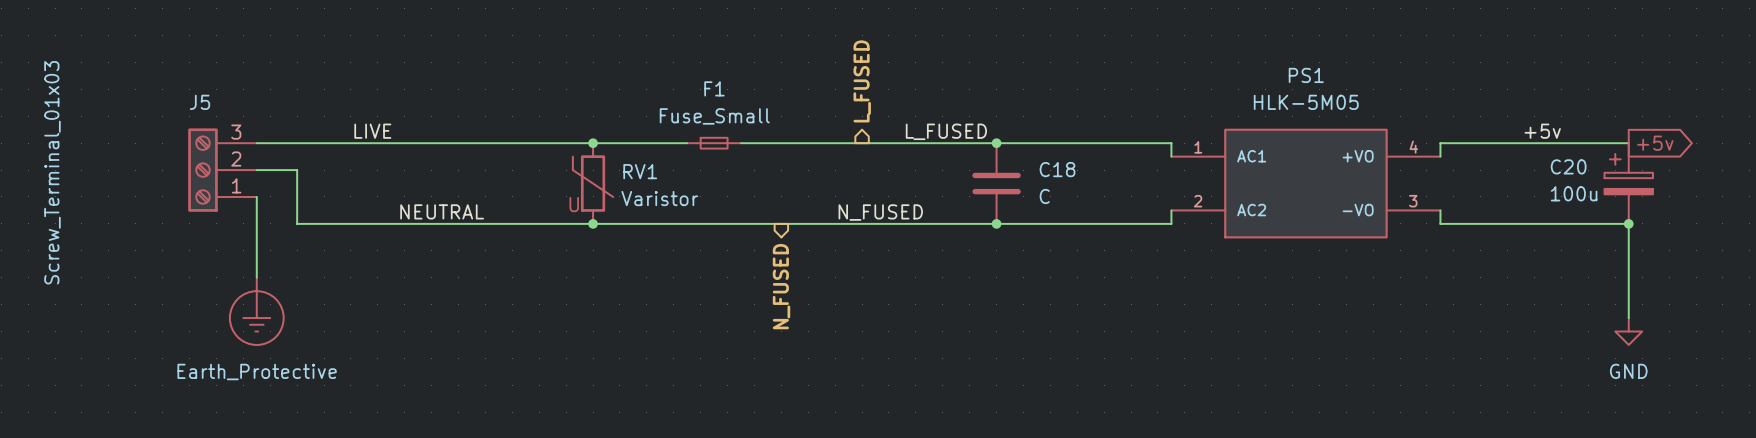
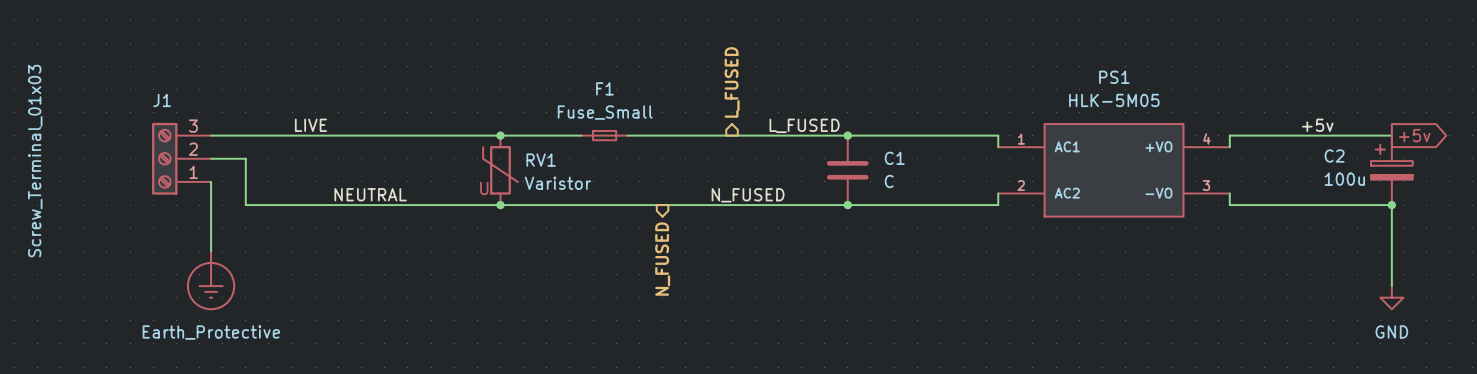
J5 name: J5 (199, 102) -> J1 (162, 100)
C20 name: C20 (1568, 166) -> C2 (1334, 156)
C18 name: C18 (1057, 169) -> C1 (894, 158)

